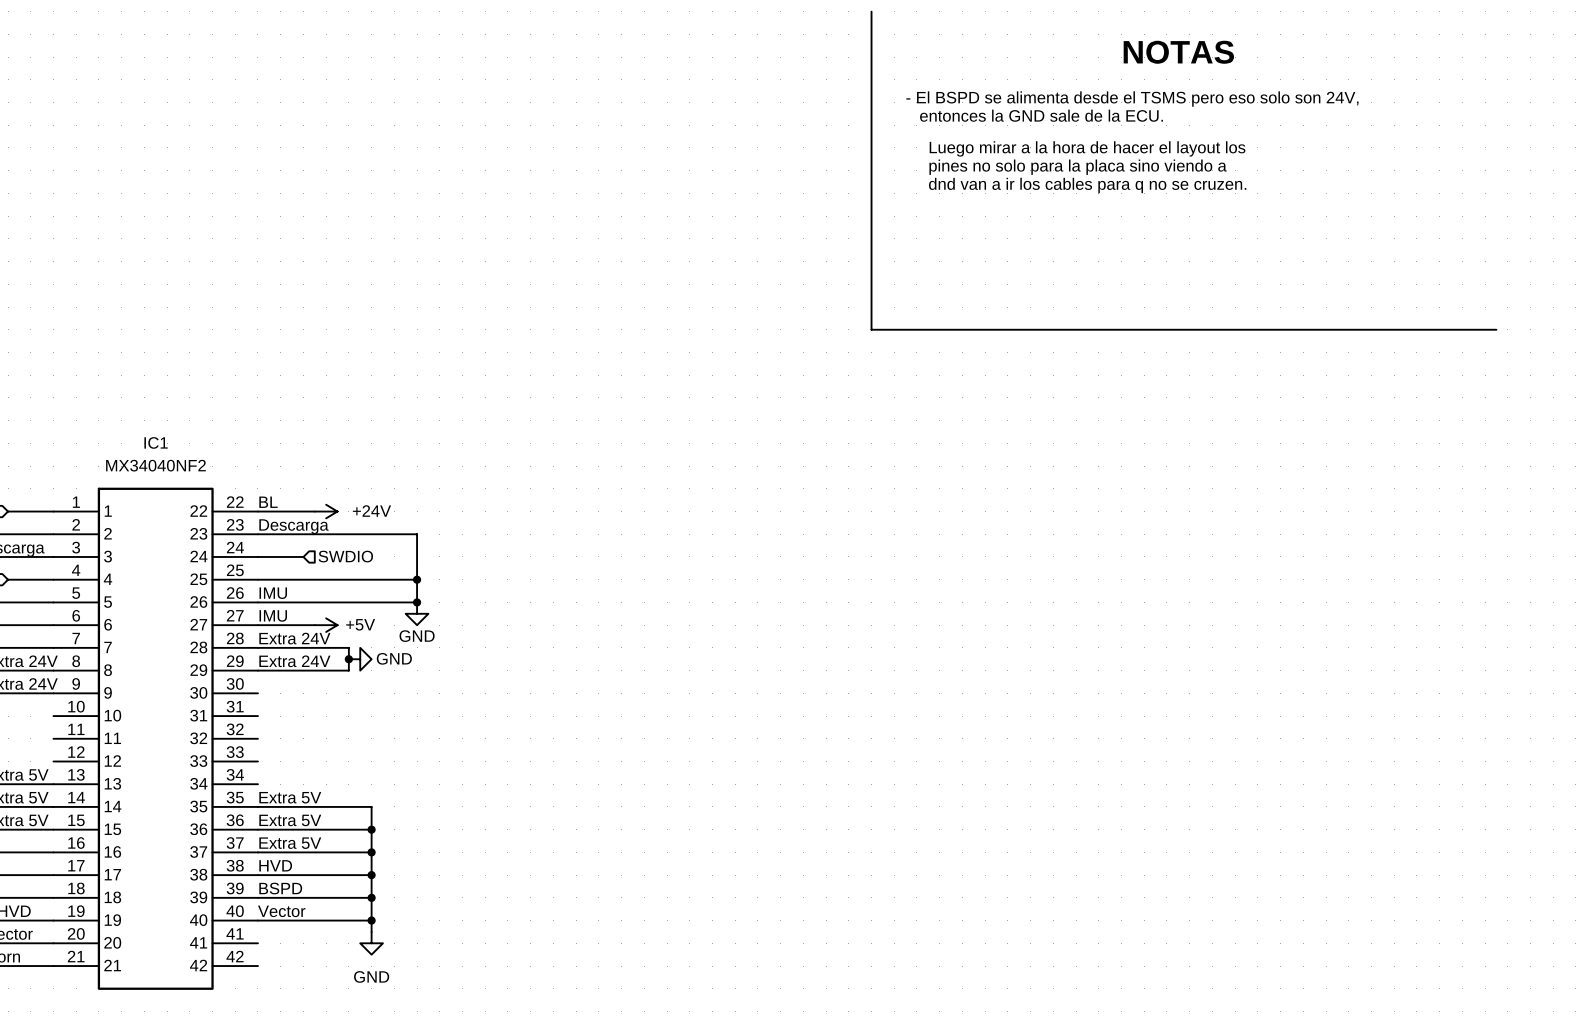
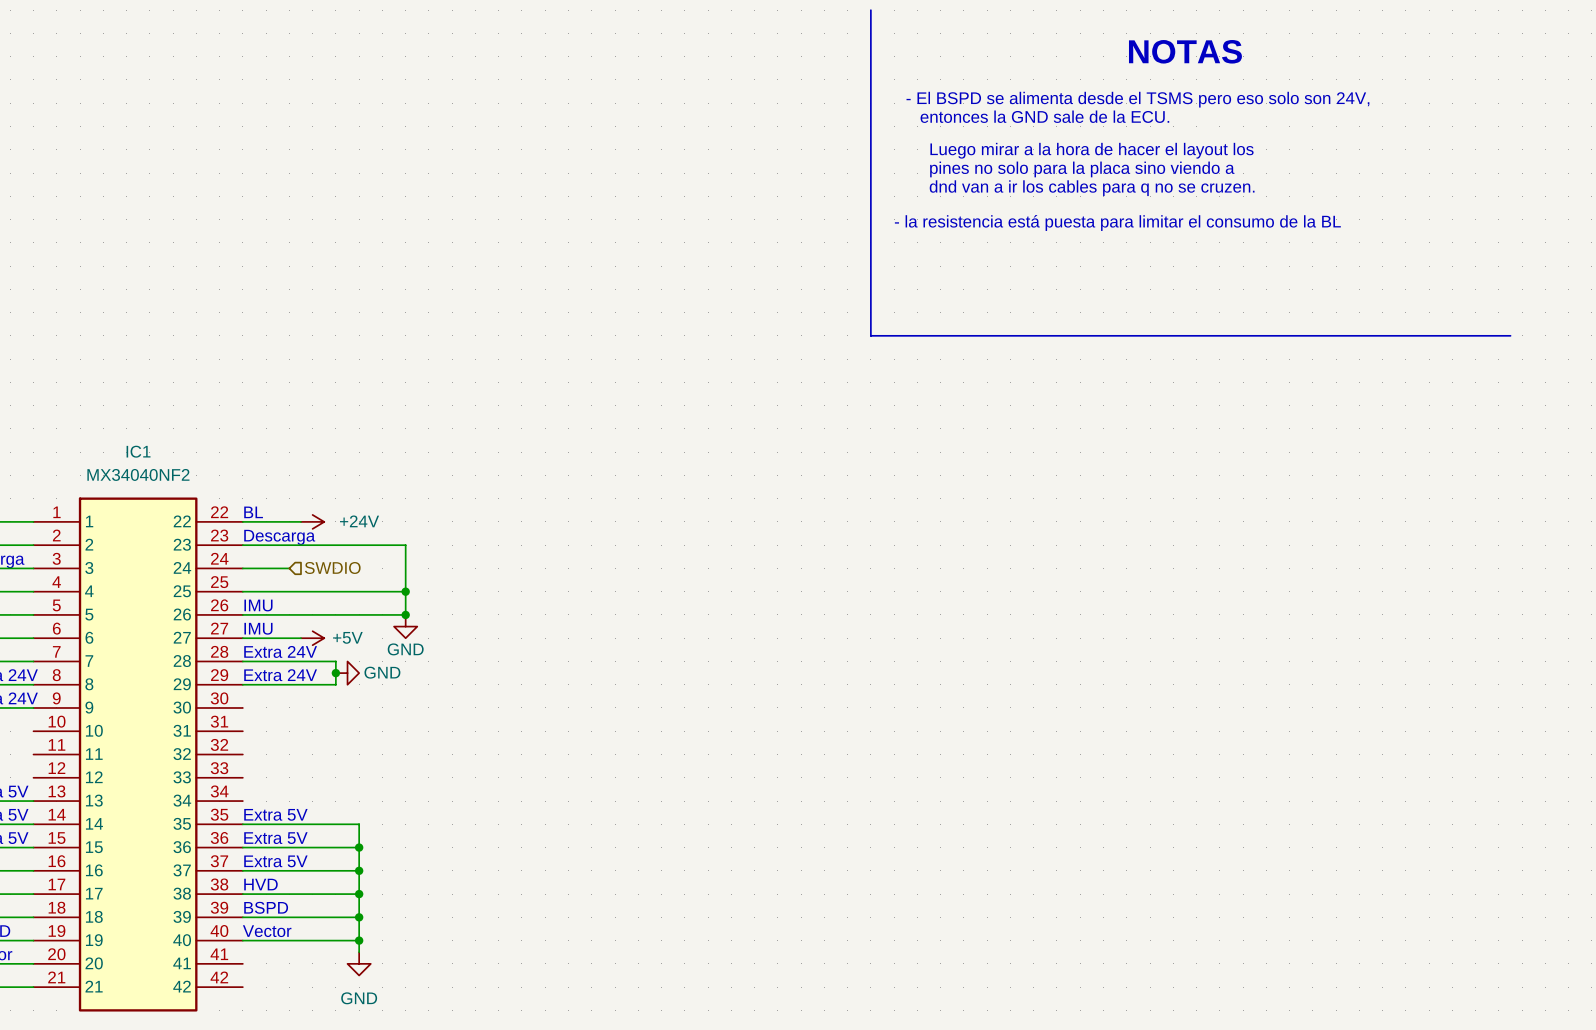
text: none -> - la resistencia está puesta para limitar el consumo de la BL (1117, 222)

